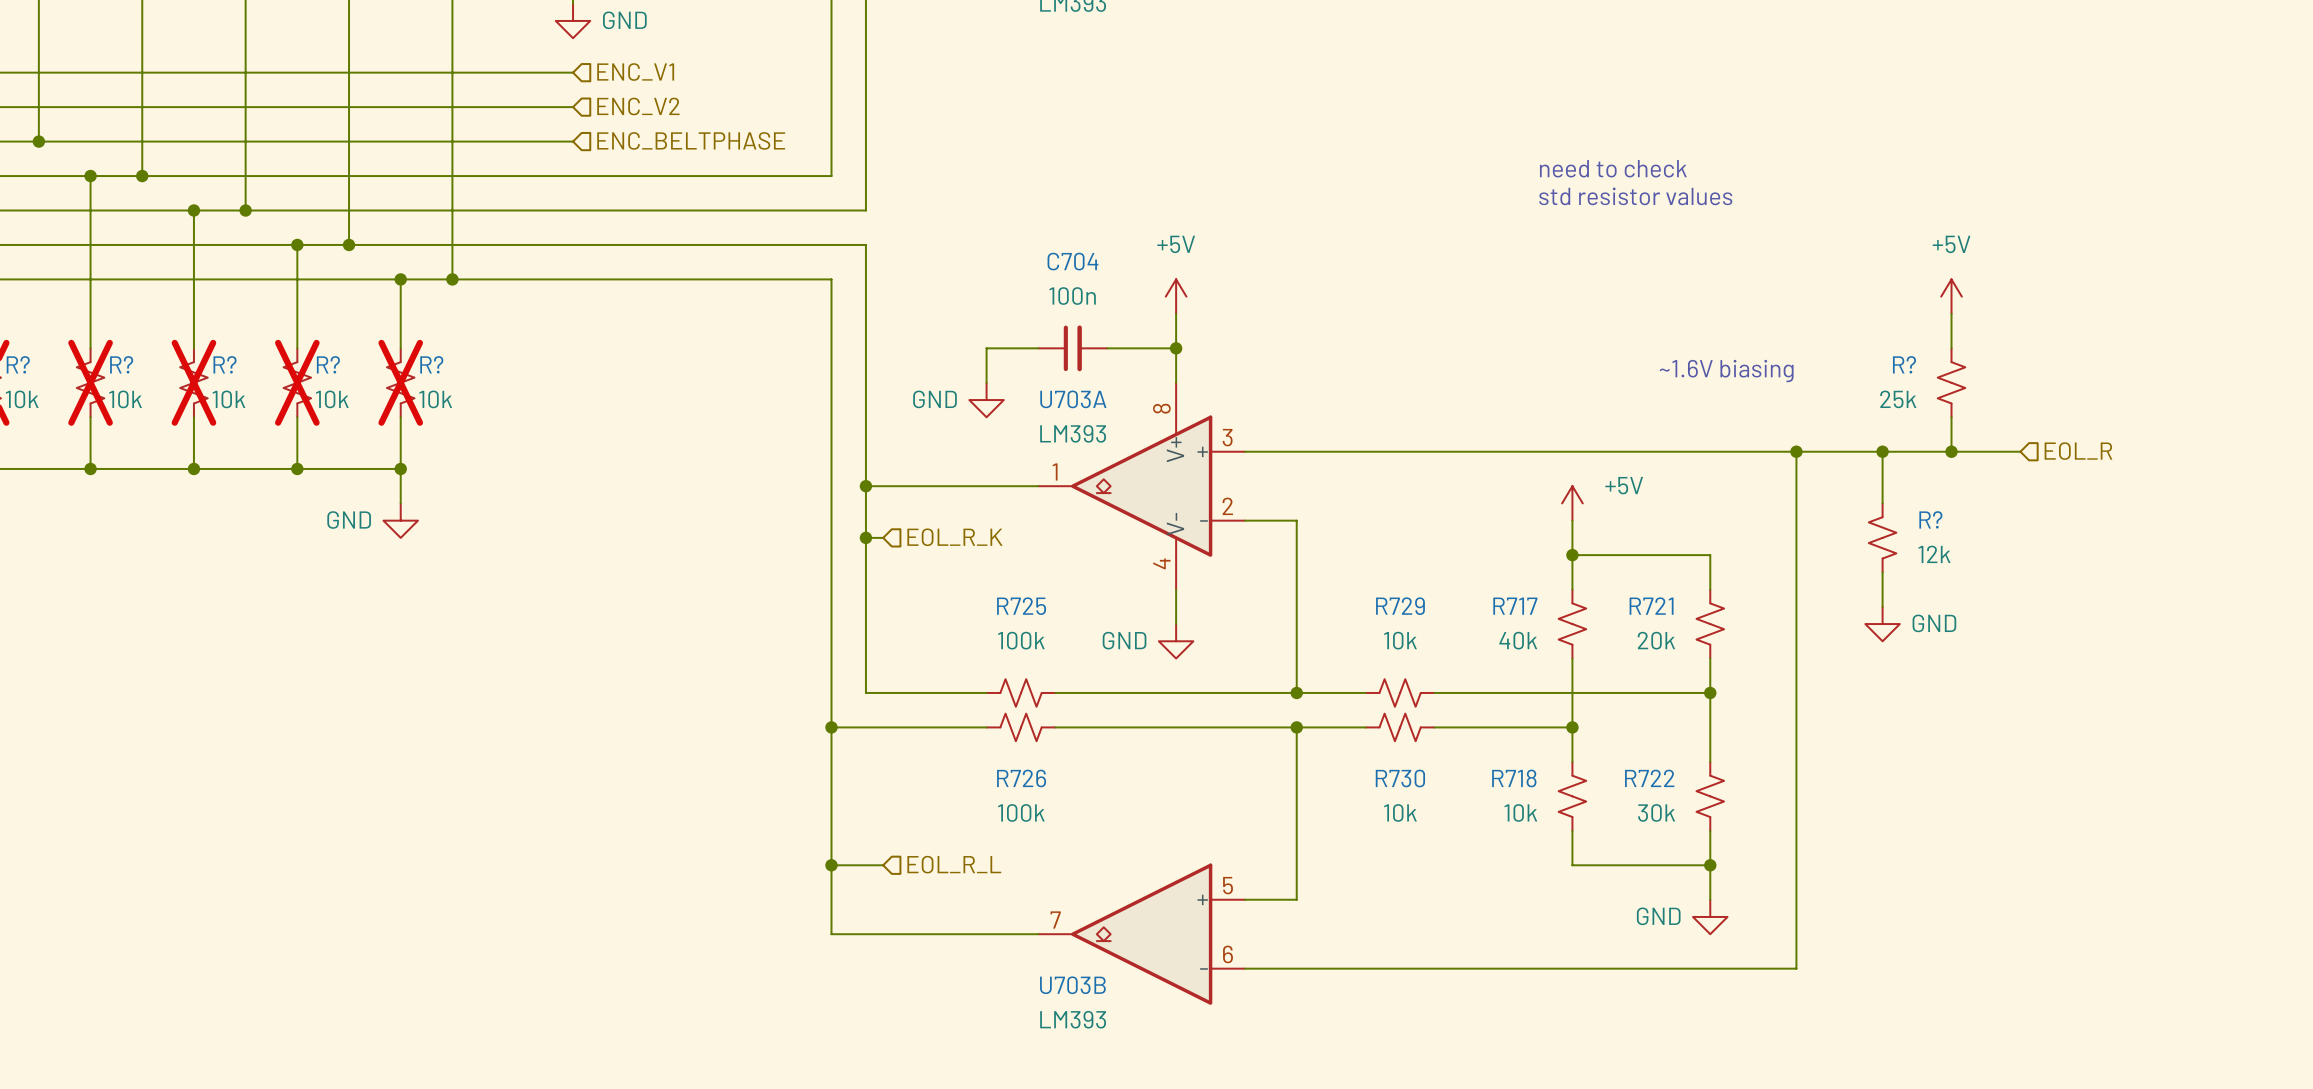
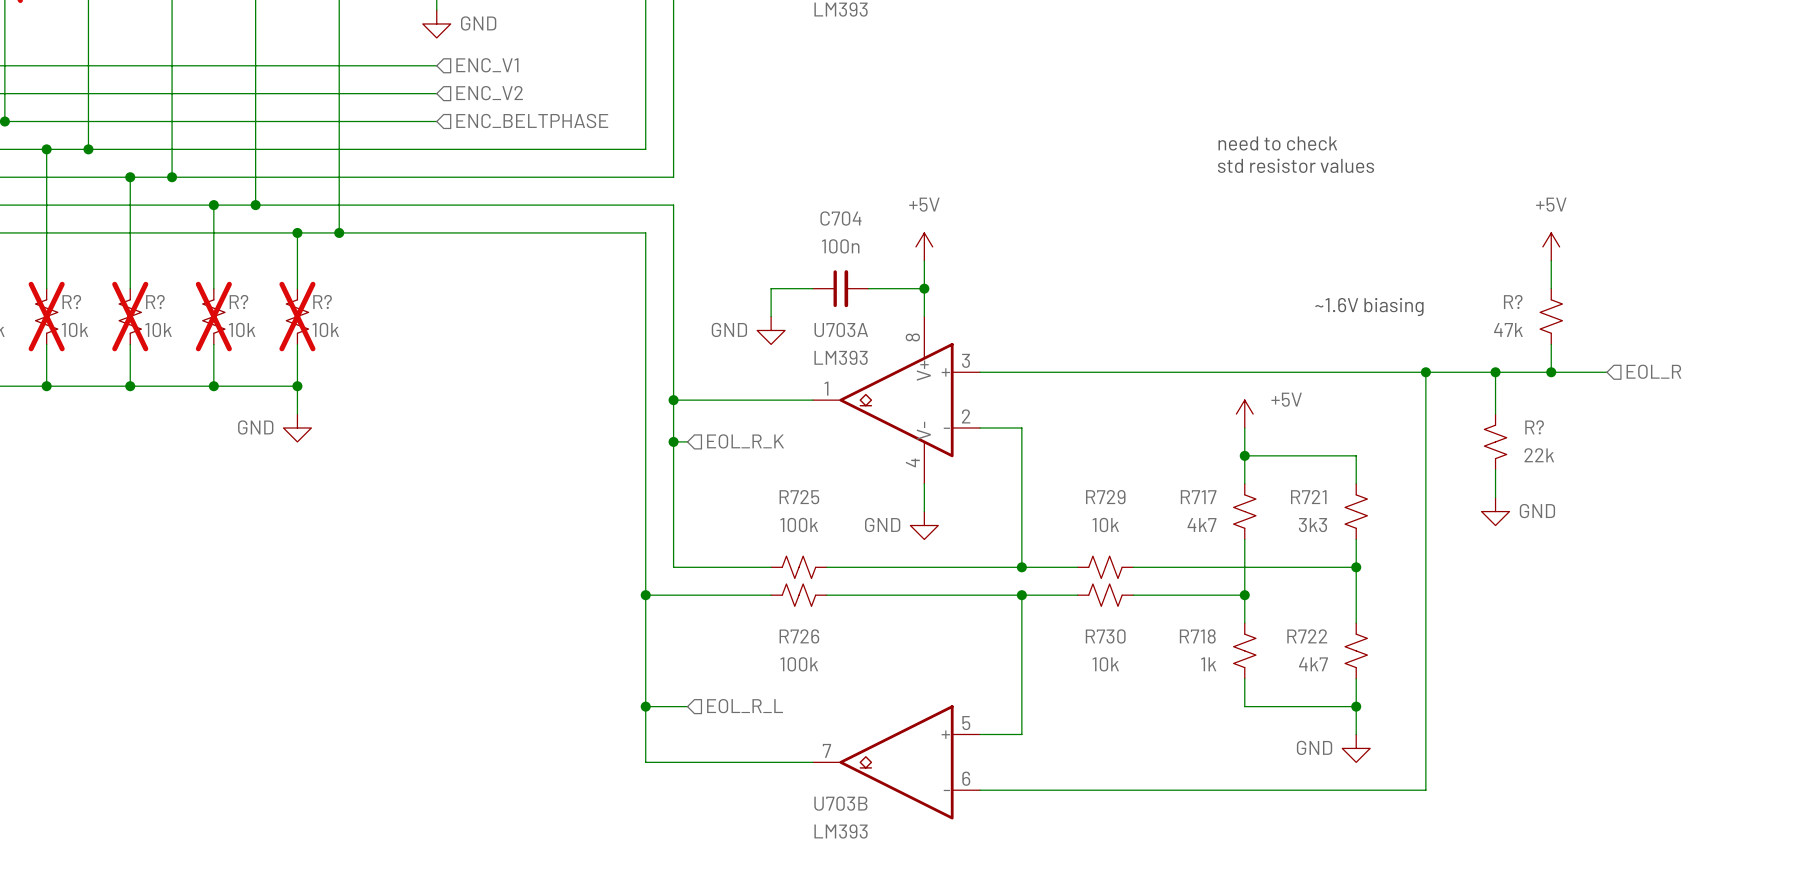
R? value: 25k (1898, 399) -> 47k (1508, 329)
R? value: 12k (1934, 554) -> 22k (1539, 455)
R717 value: 40k (1518, 640) -> 4k7 (1202, 524)
R721 value: 20k (1656, 640) -> 3k3 (1312, 525)
R718 value: 10k (1520, 812) -> 1k (1208, 664)
R722 value: 30k (1656, 812) -> 4k7 (1313, 664)

